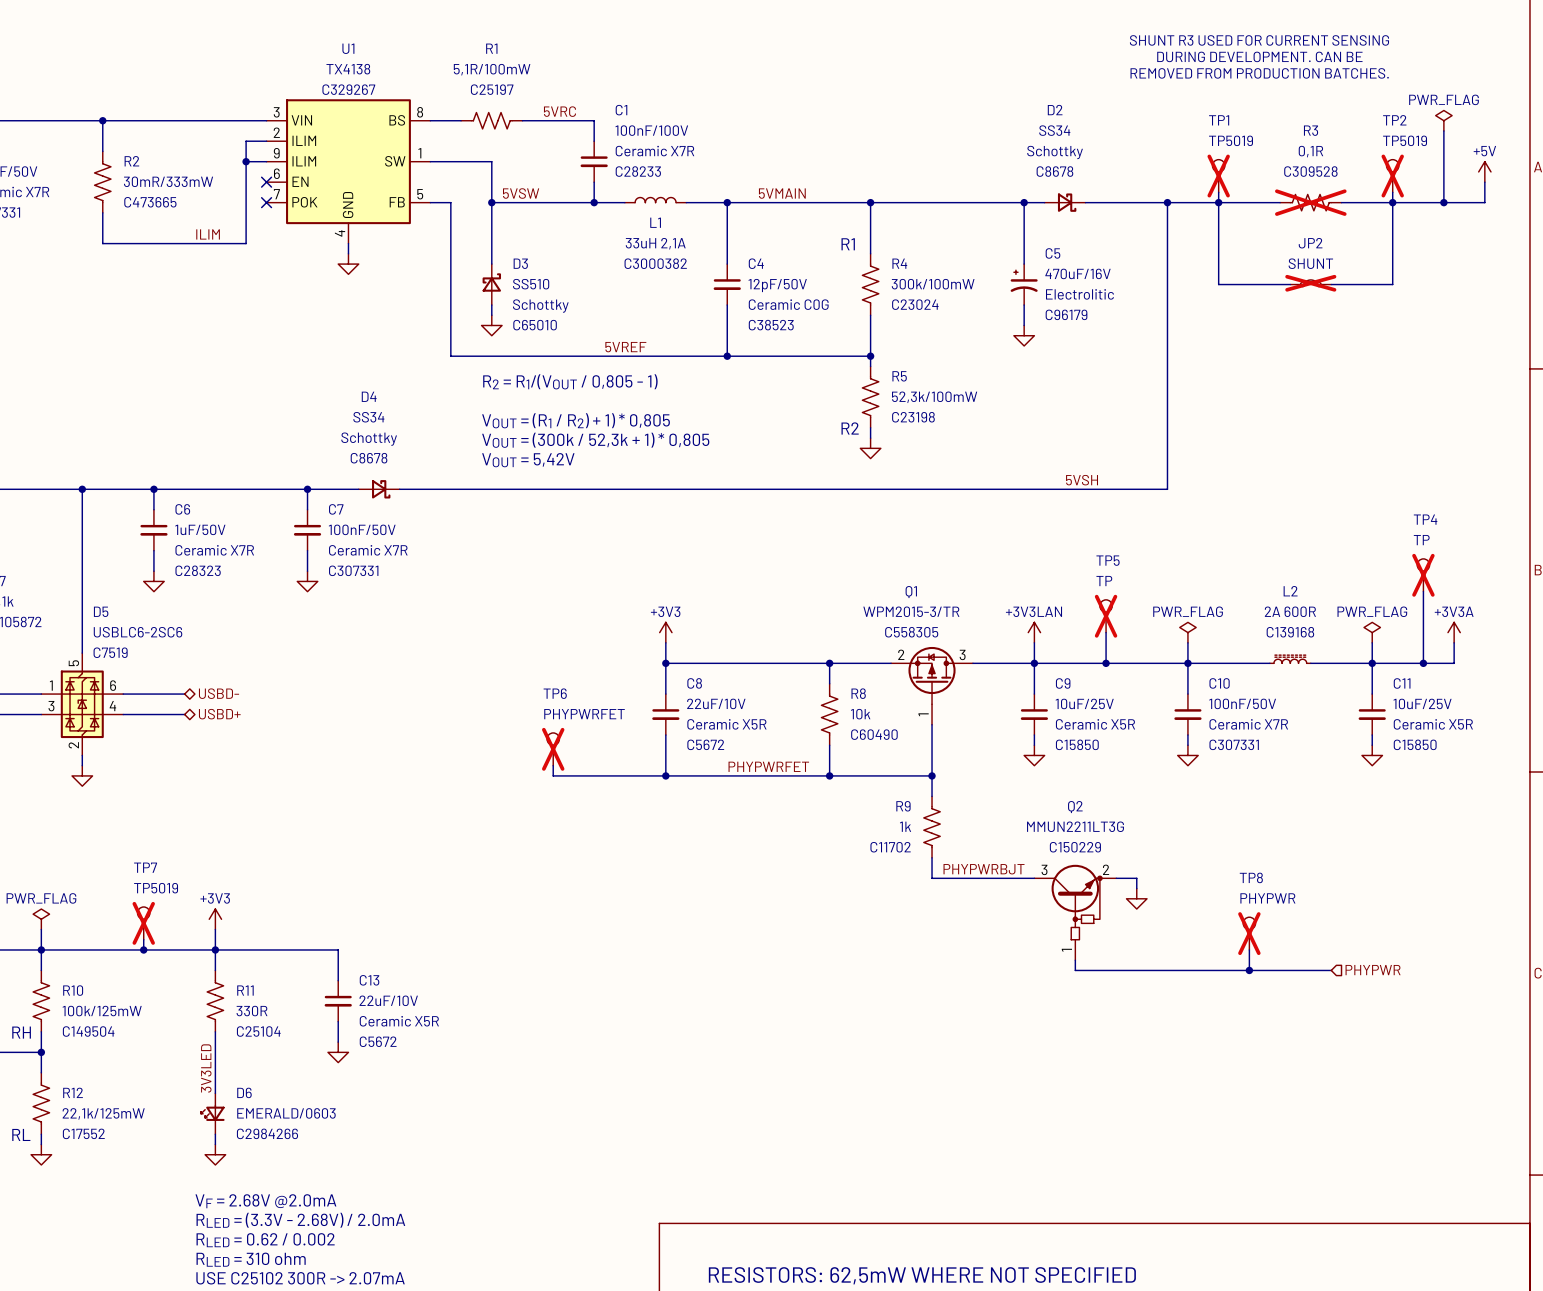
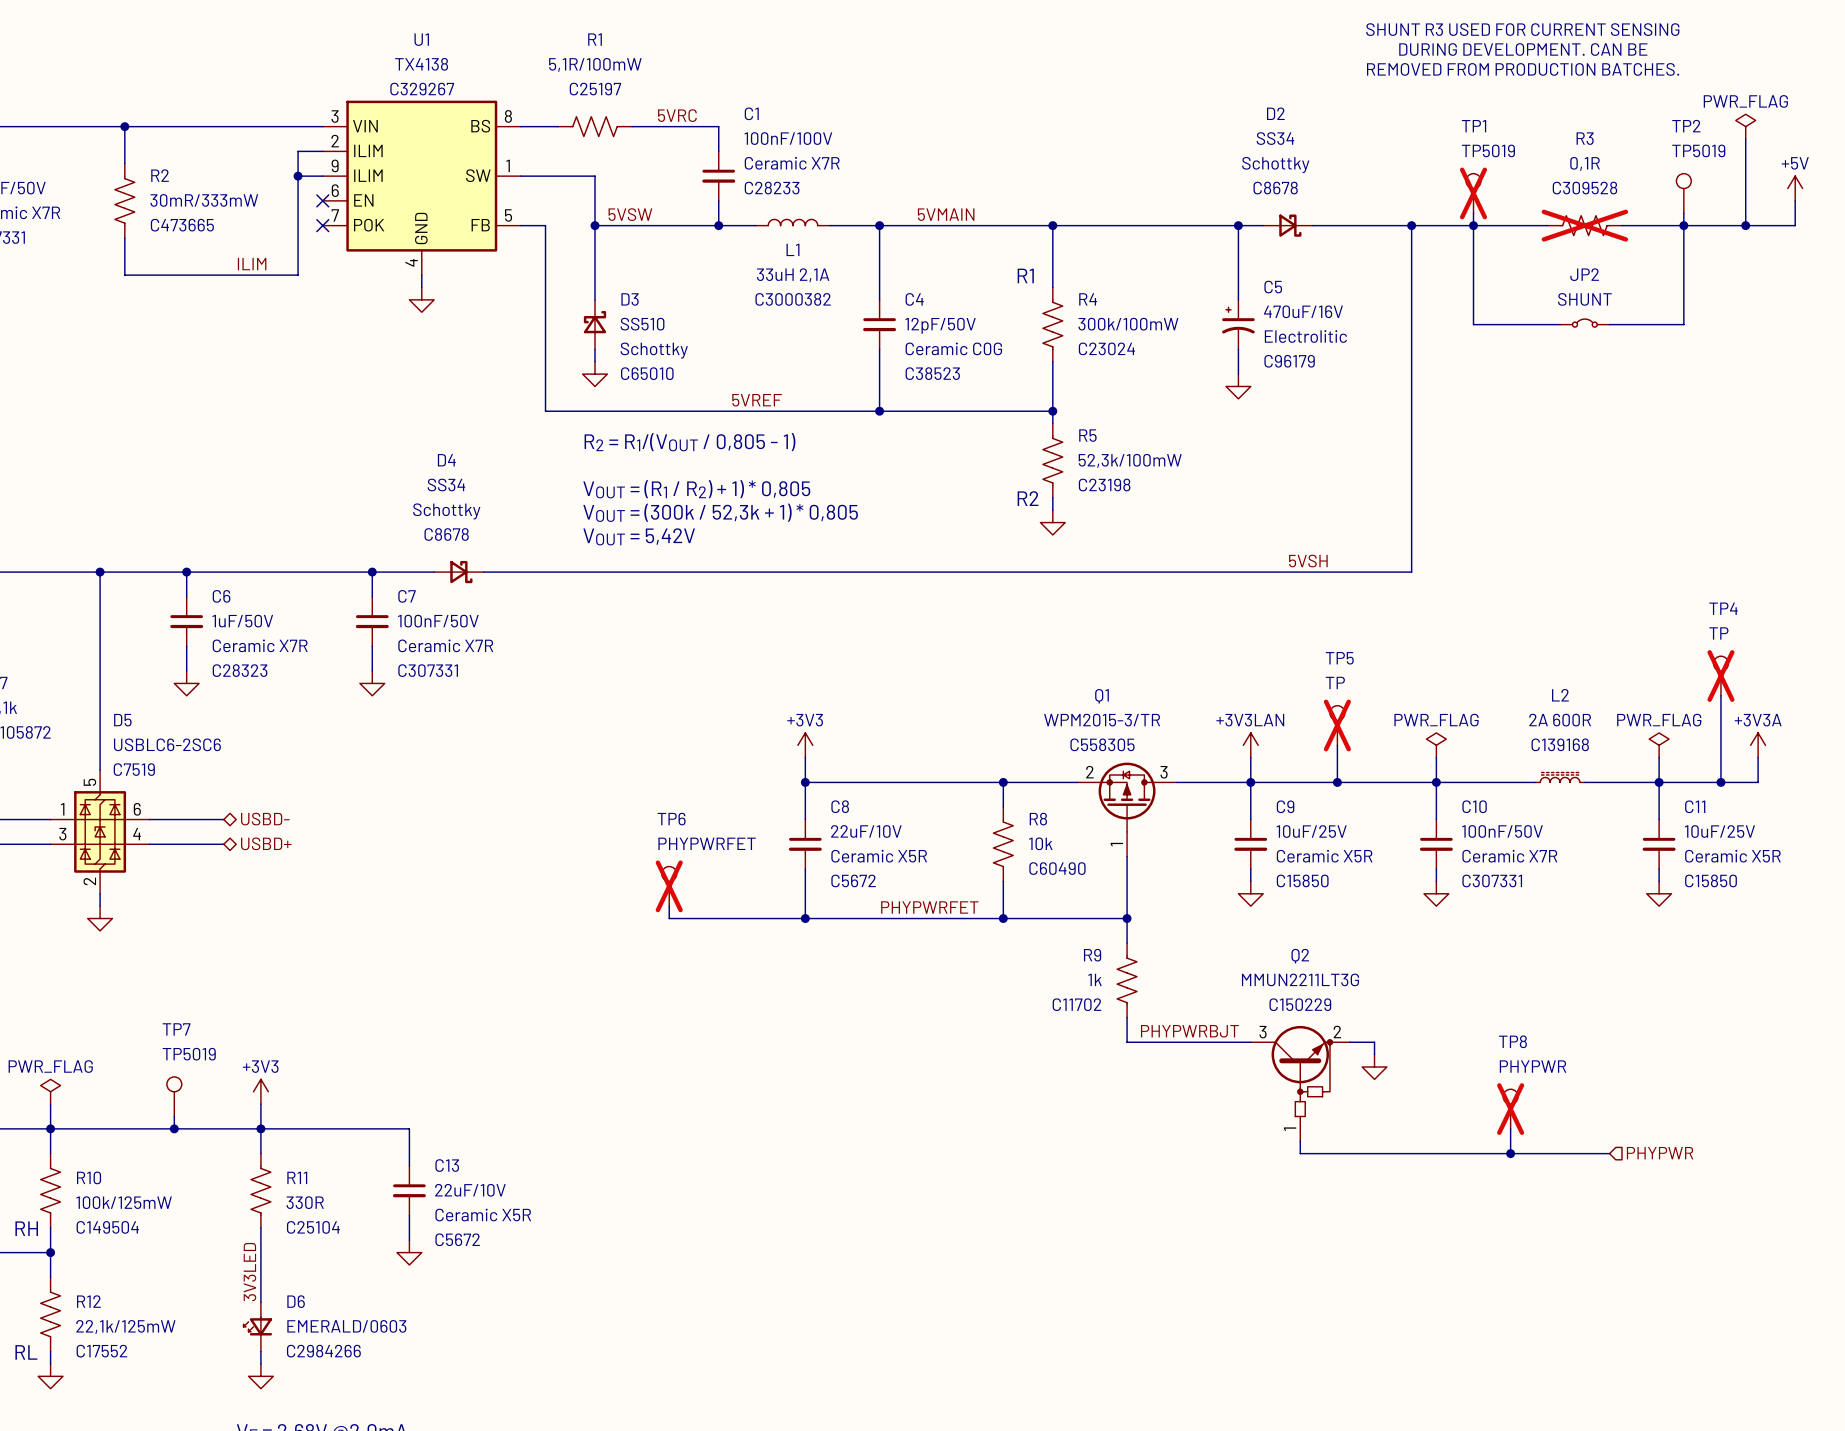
TP2 do-not-place cross: (1392, 176) -> none
JP2 do-not-place cross: (1310, 283) -> none
TP7 do-not-place cross: (143, 923) -> none

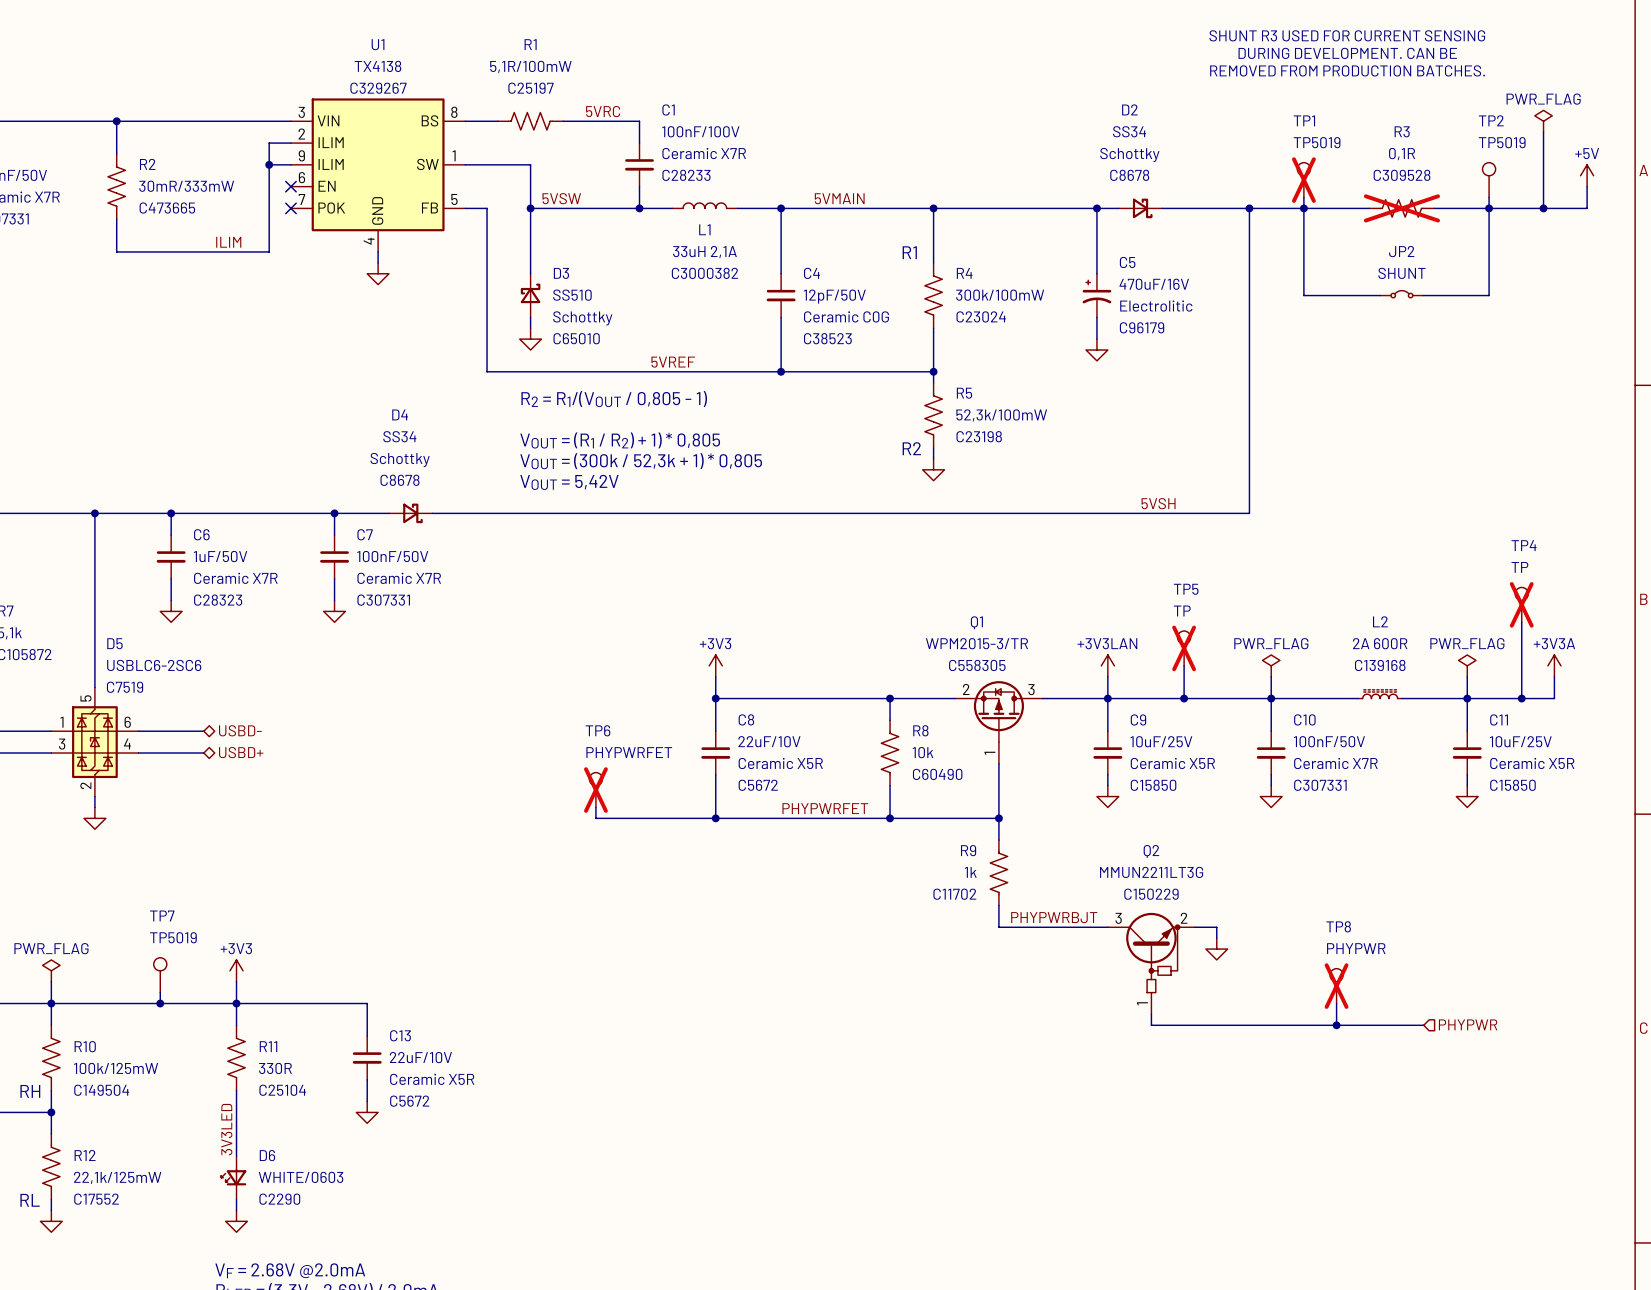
D6 value: EMERALD/0603 (346, 1326) -> WHITE/0603 (300, 1177)
D6 text: C2984266 (323, 1351) -> C2290 (279, 1199)

